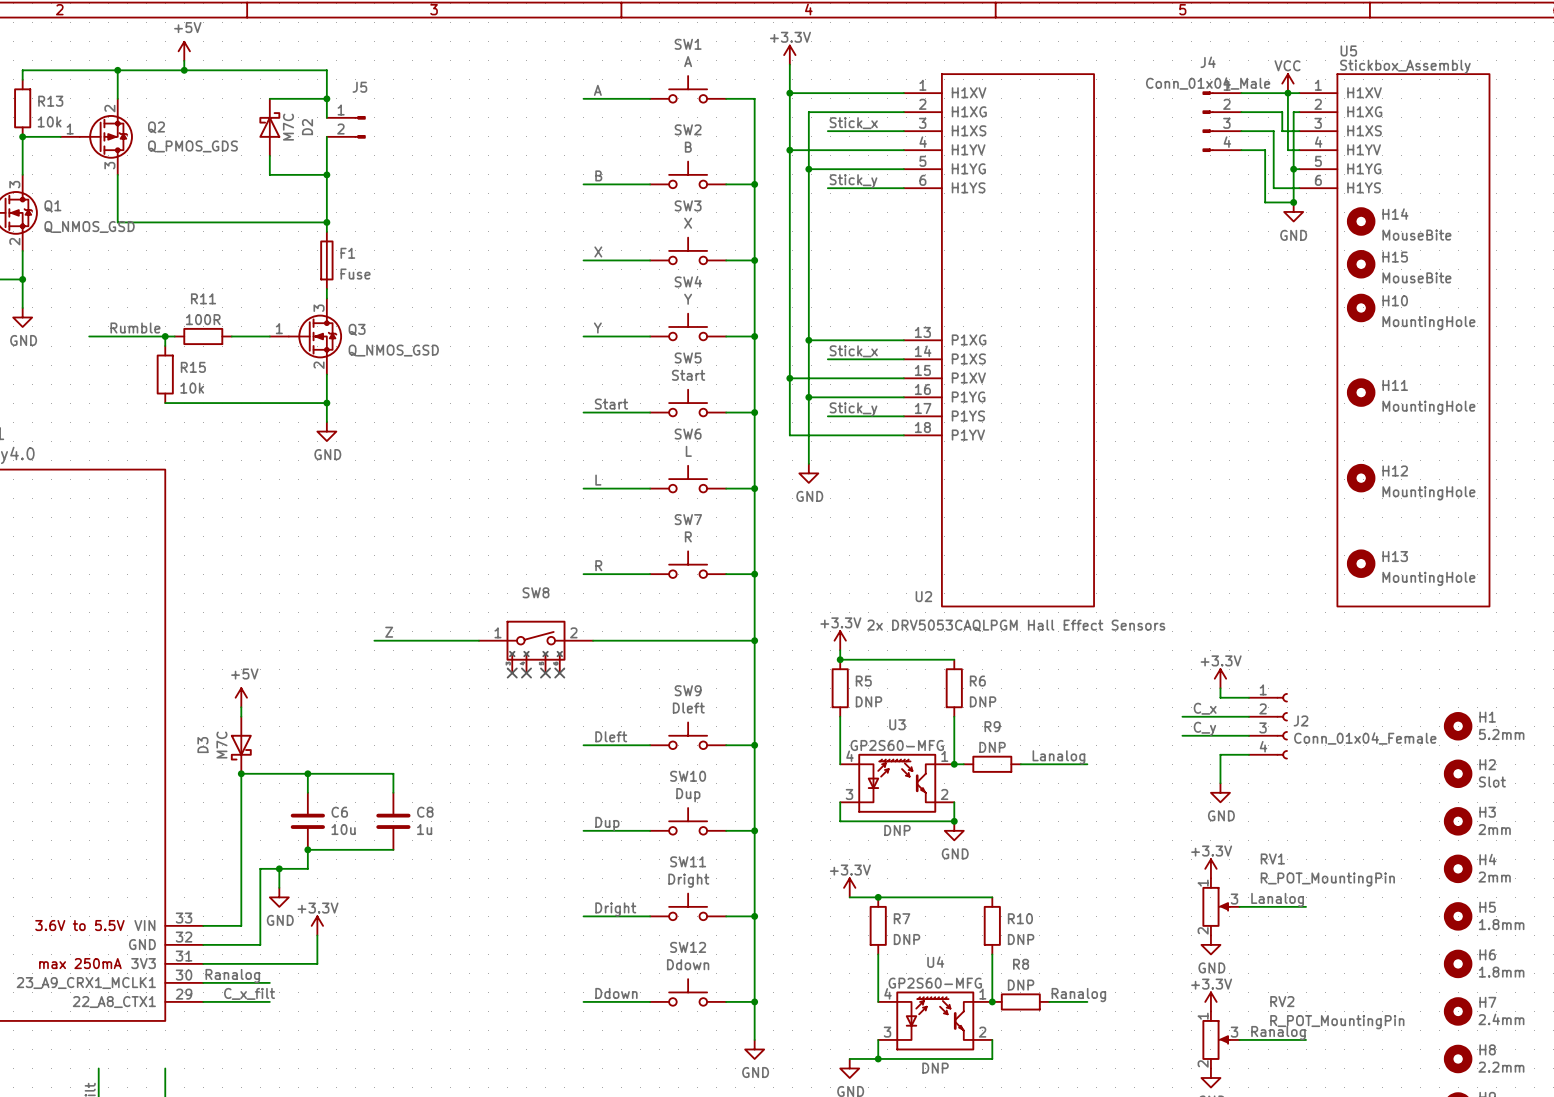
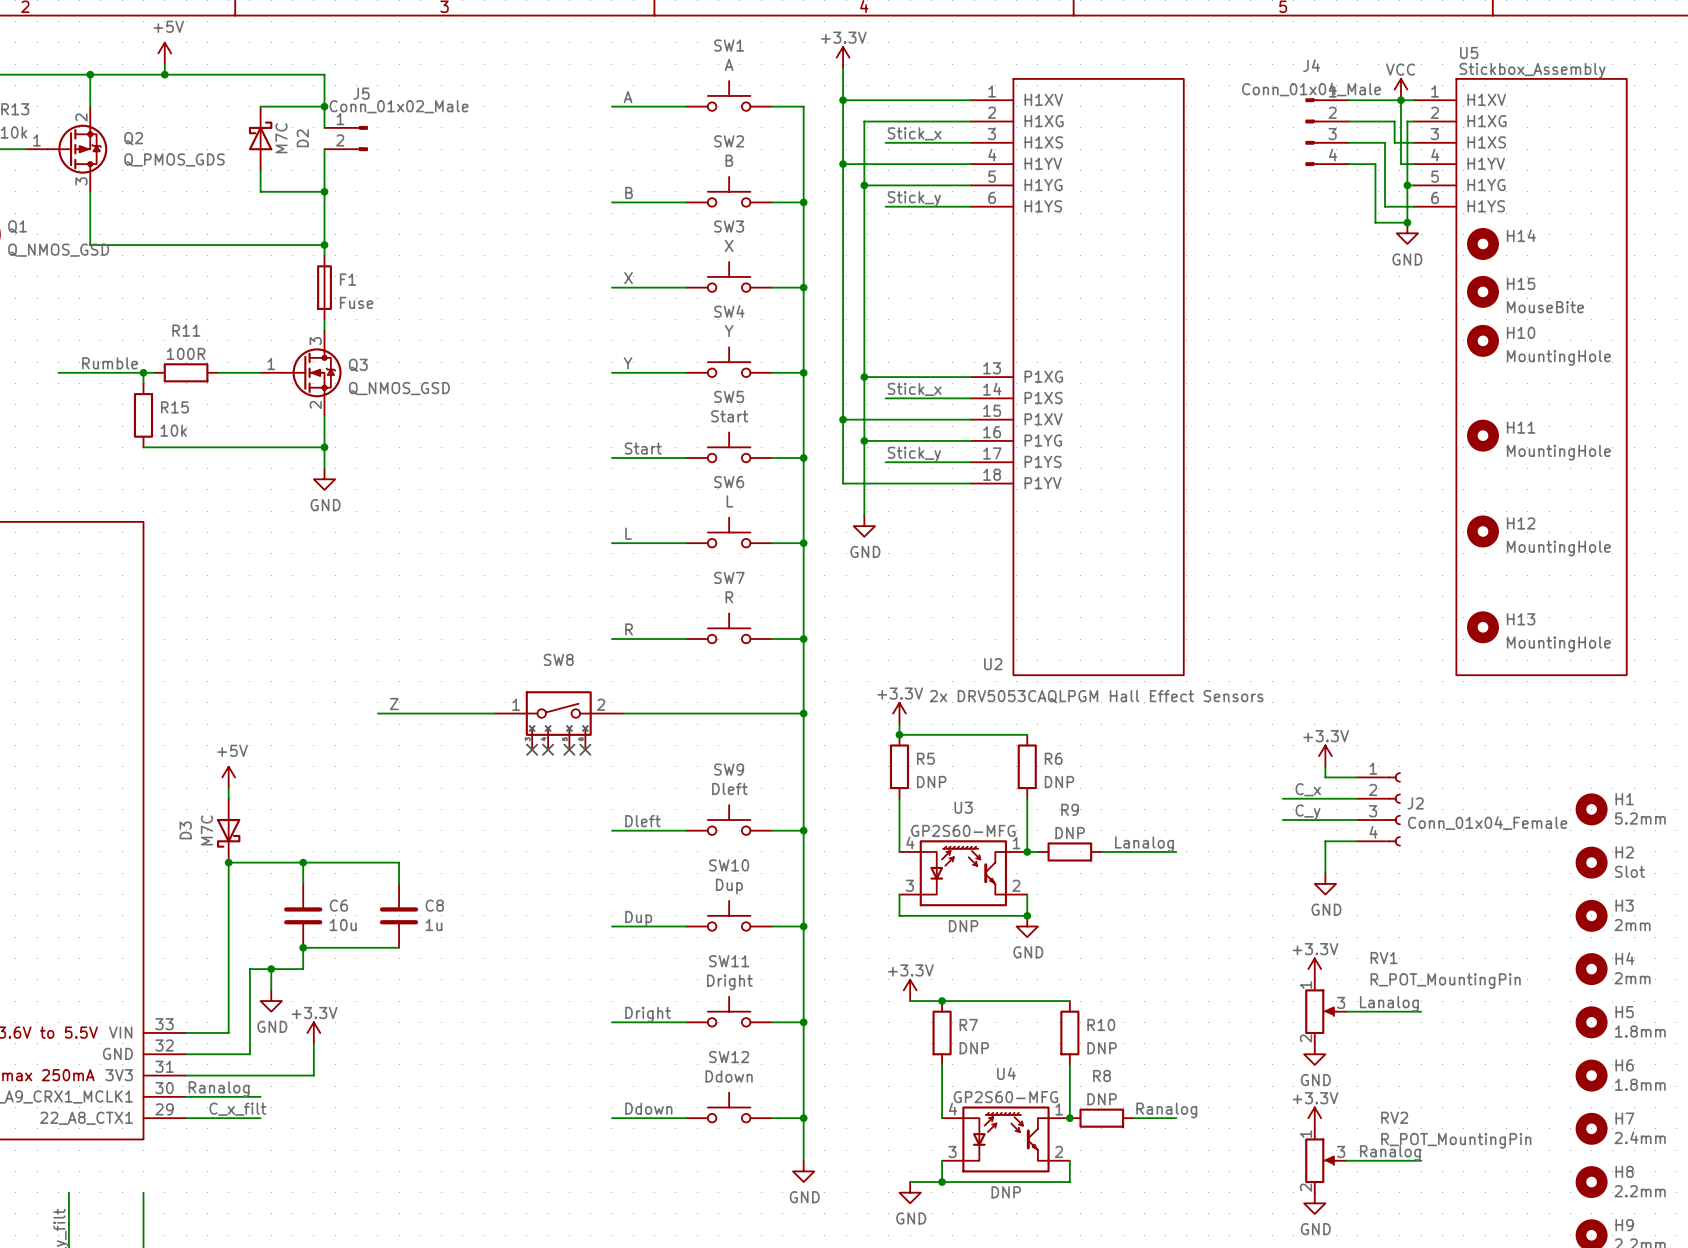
J5 value: none -> Conn_01x02_Male (399, 106)
H14 value: MouseBite (1416, 235) -> none

